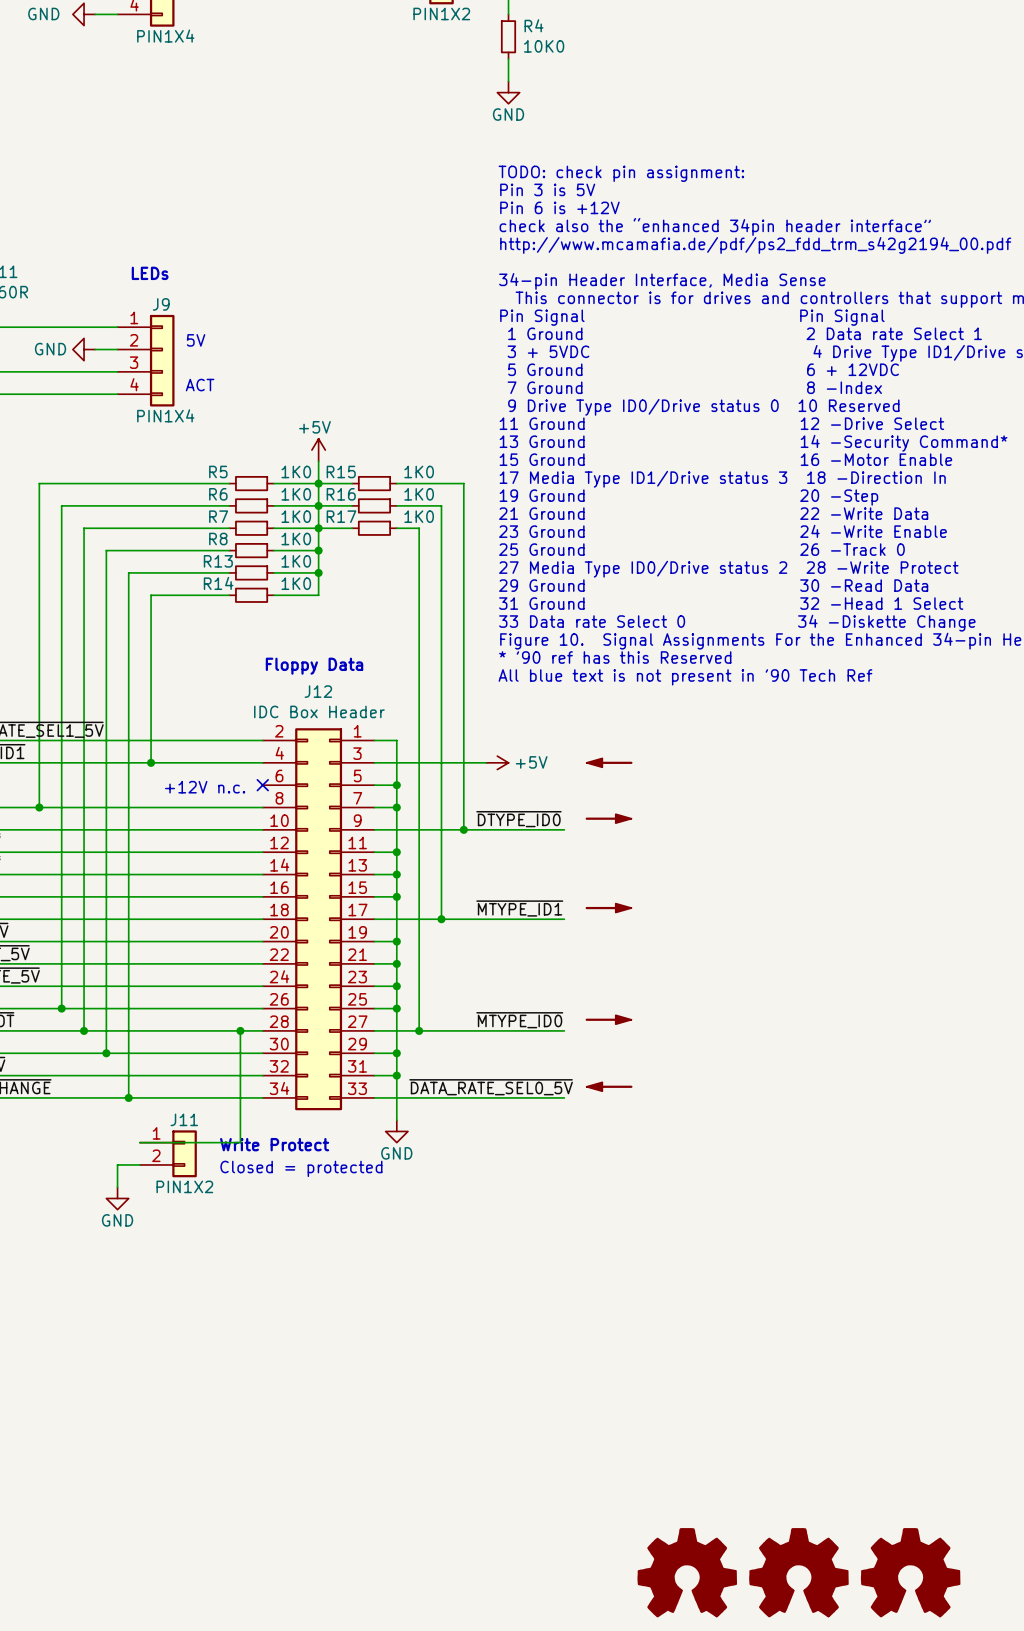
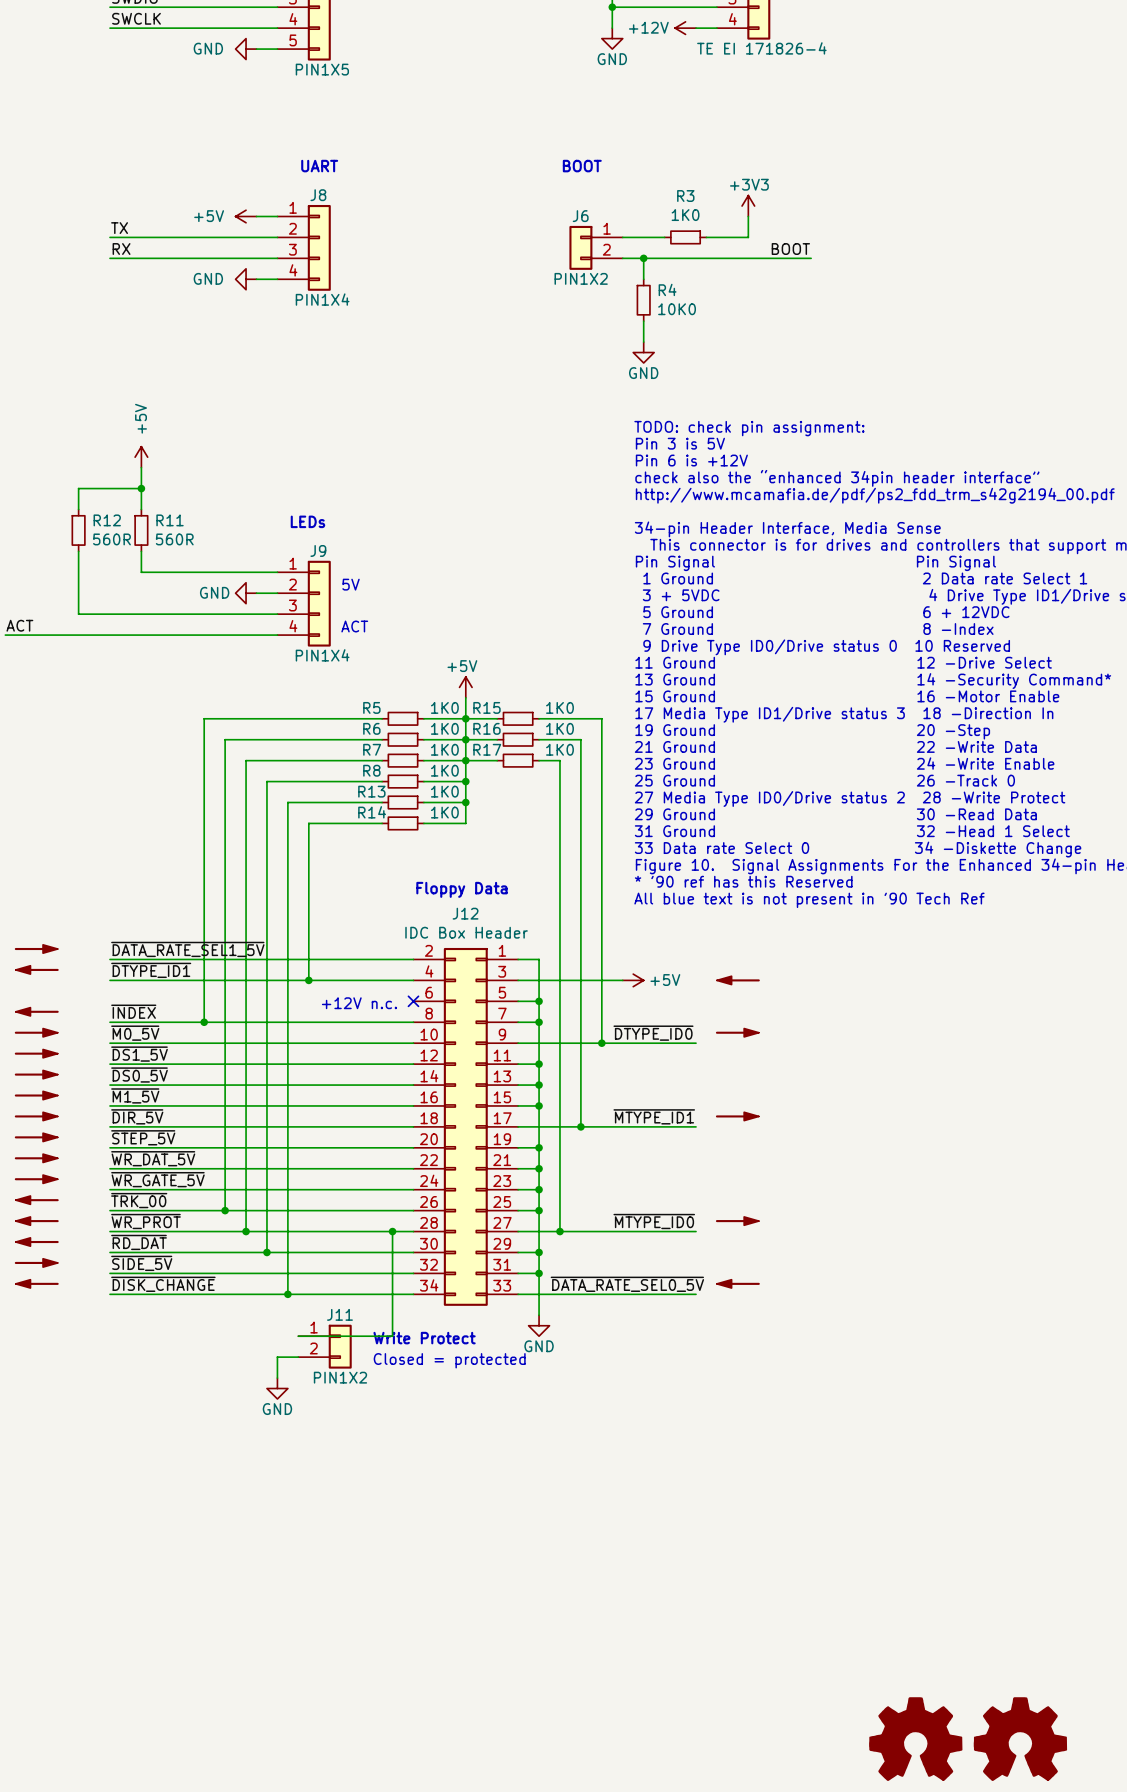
part: (687, 1572) -> none

